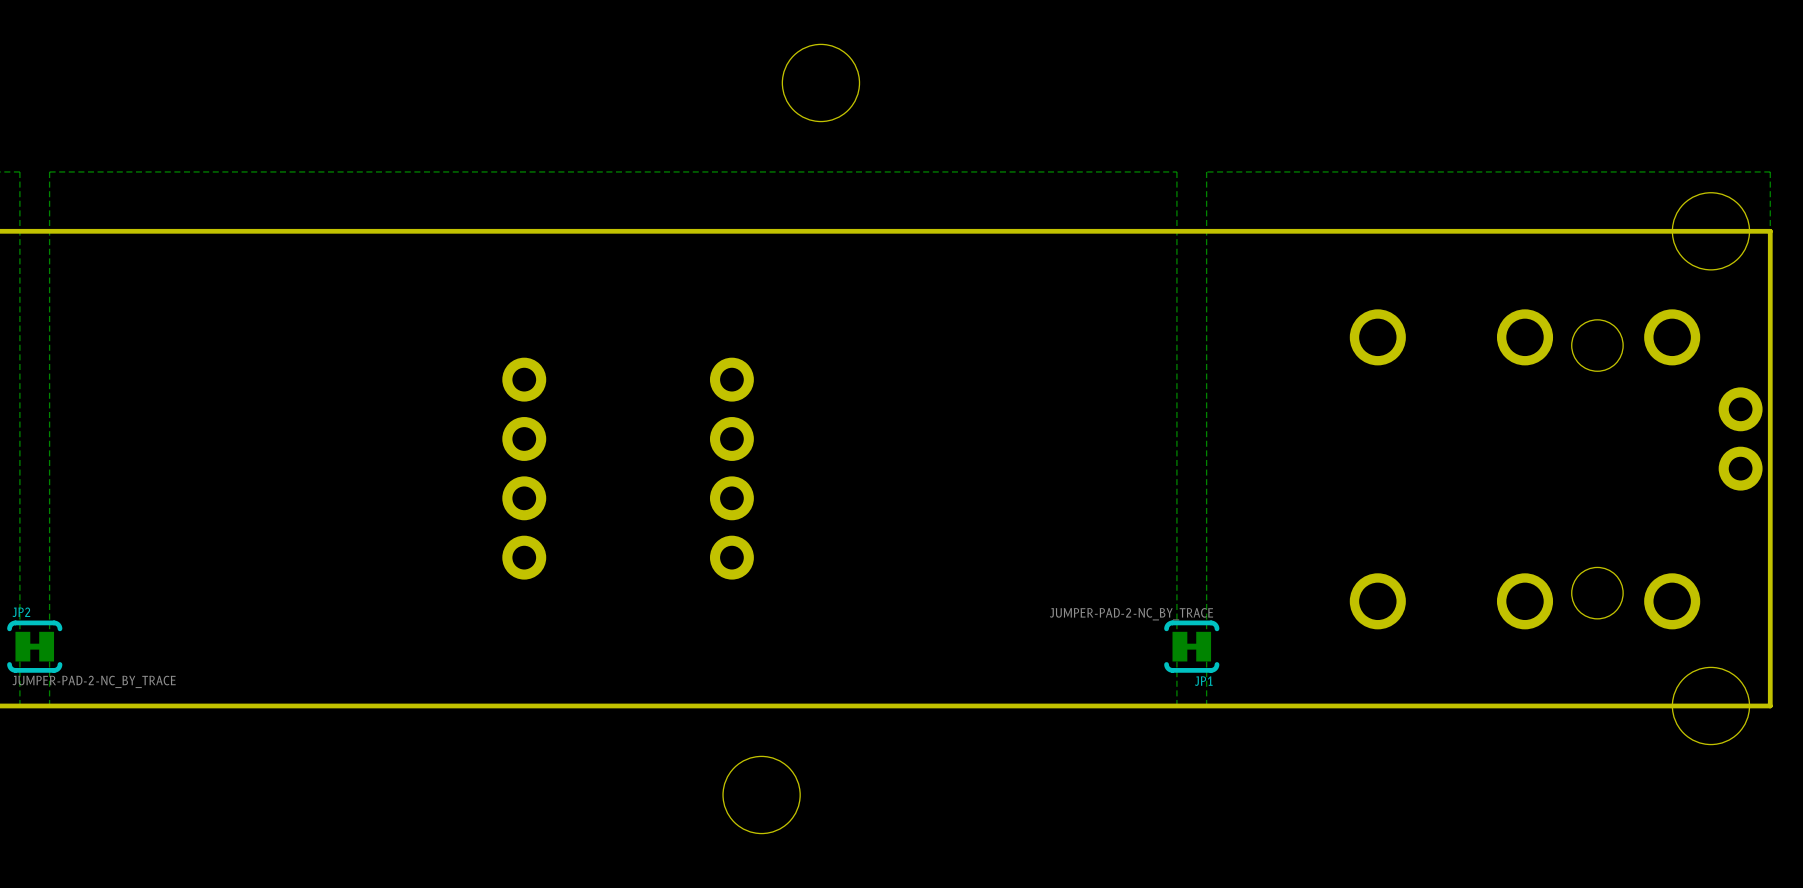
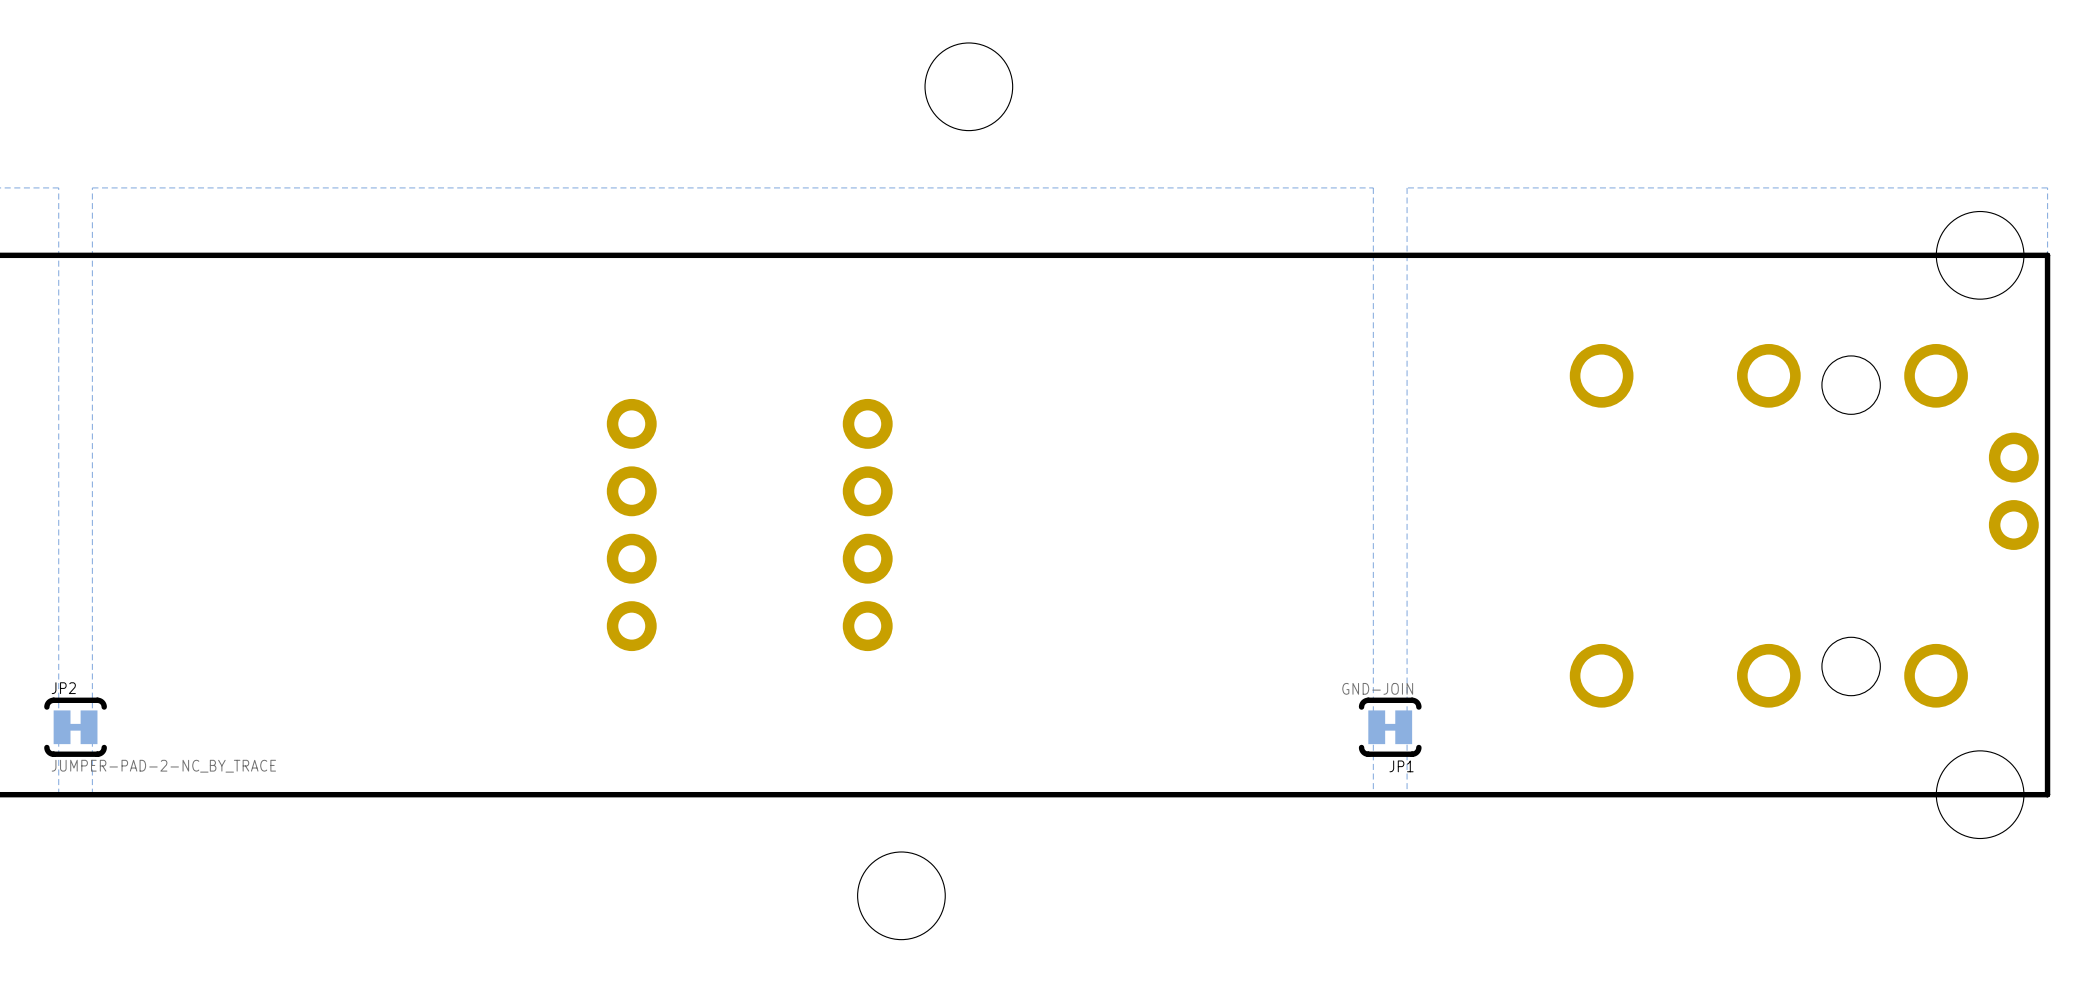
JP1 value: JUMPER-PAD-2-NC_BY_TRACE (1131, 614) -> GND-JOIN (1377, 688)

